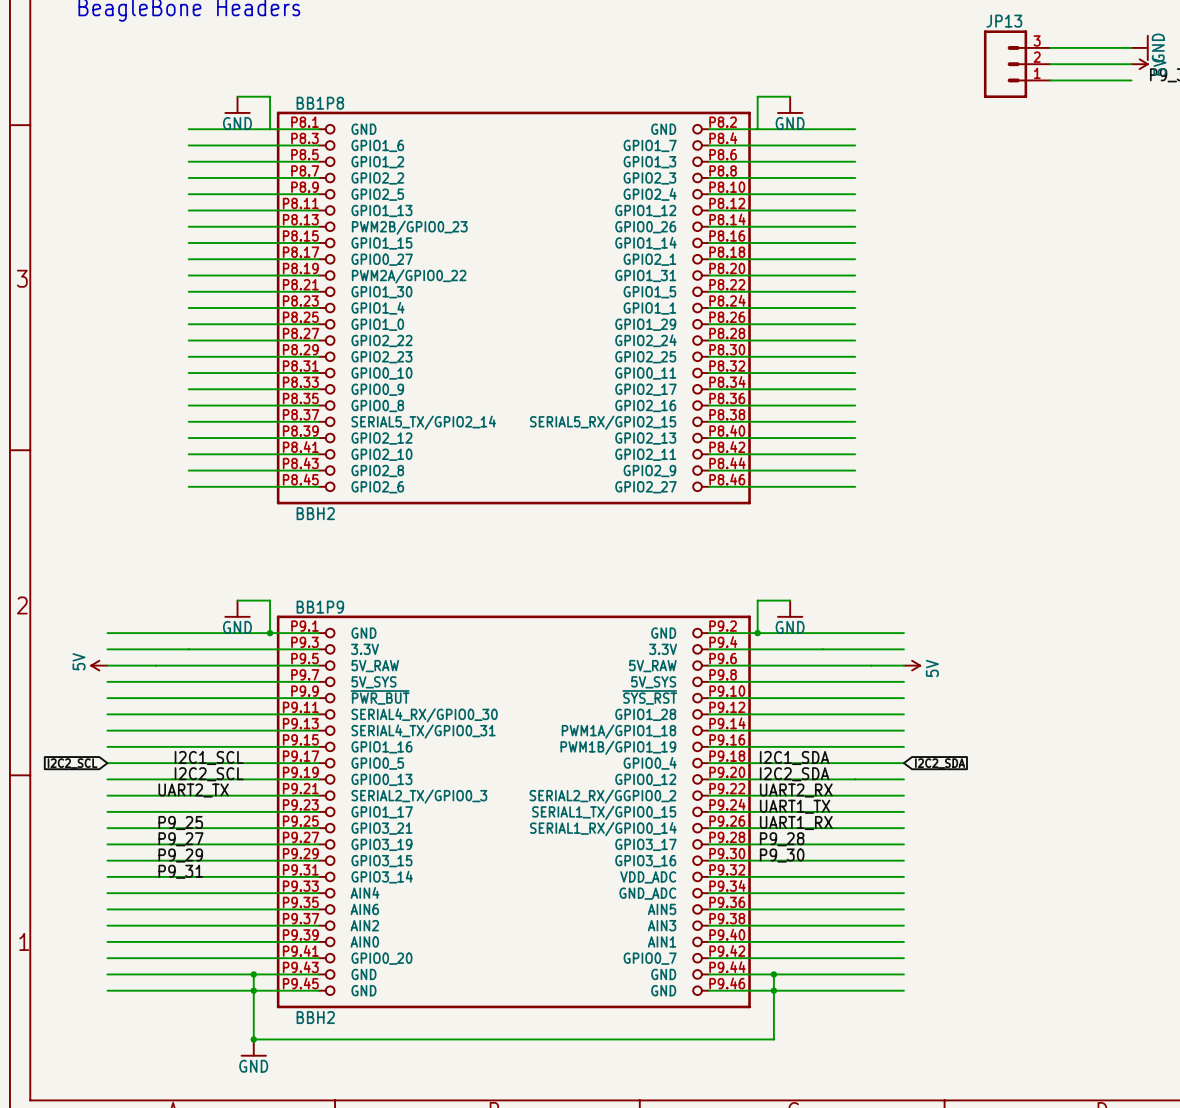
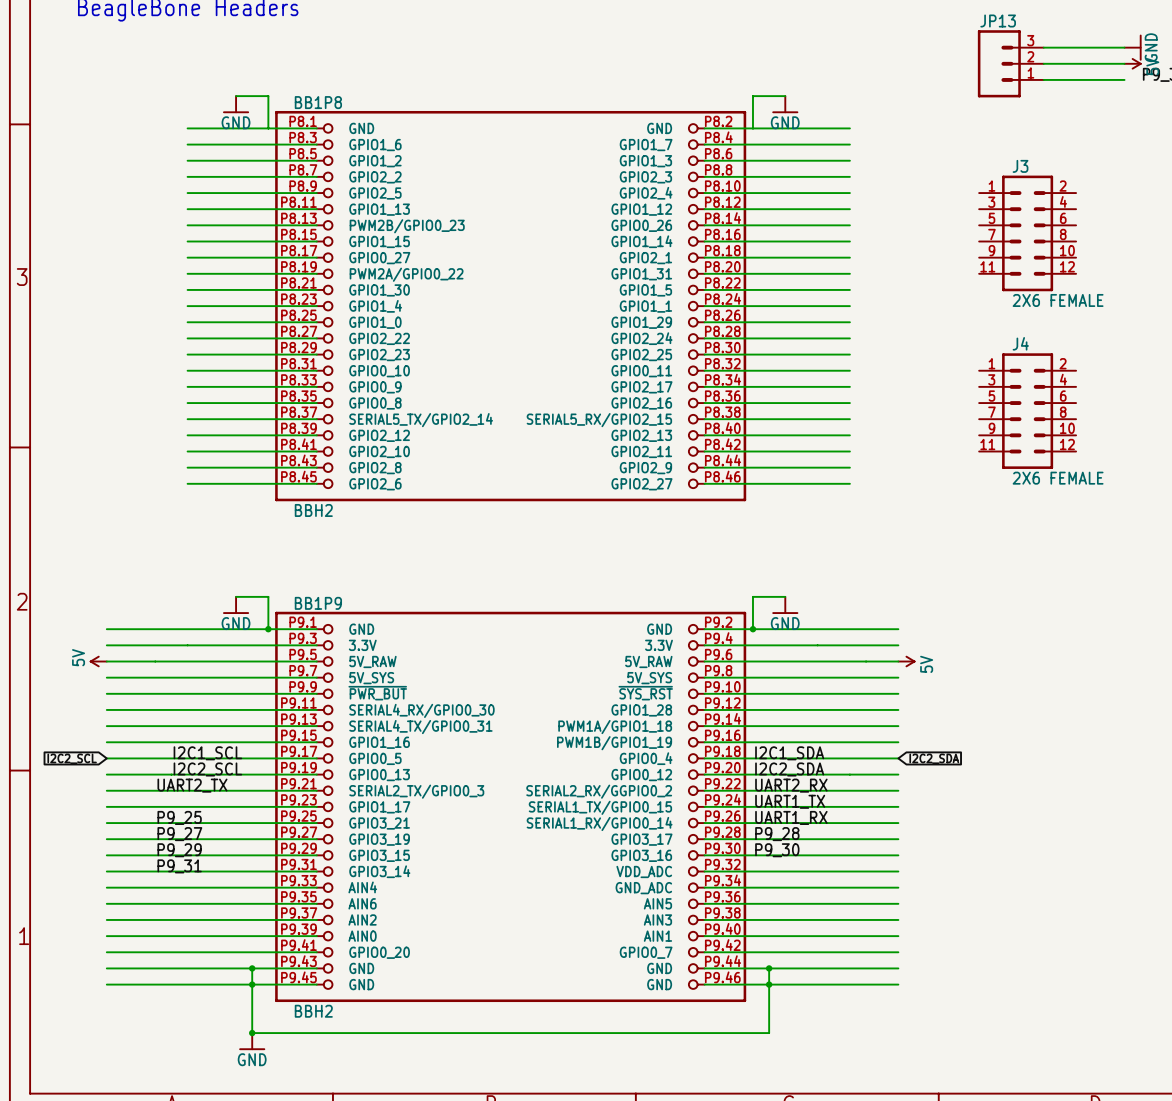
J3: none -> 2X6 FEMALE (1027, 233)
J4: none -> 2X6 FEMALE (1027, 411)

